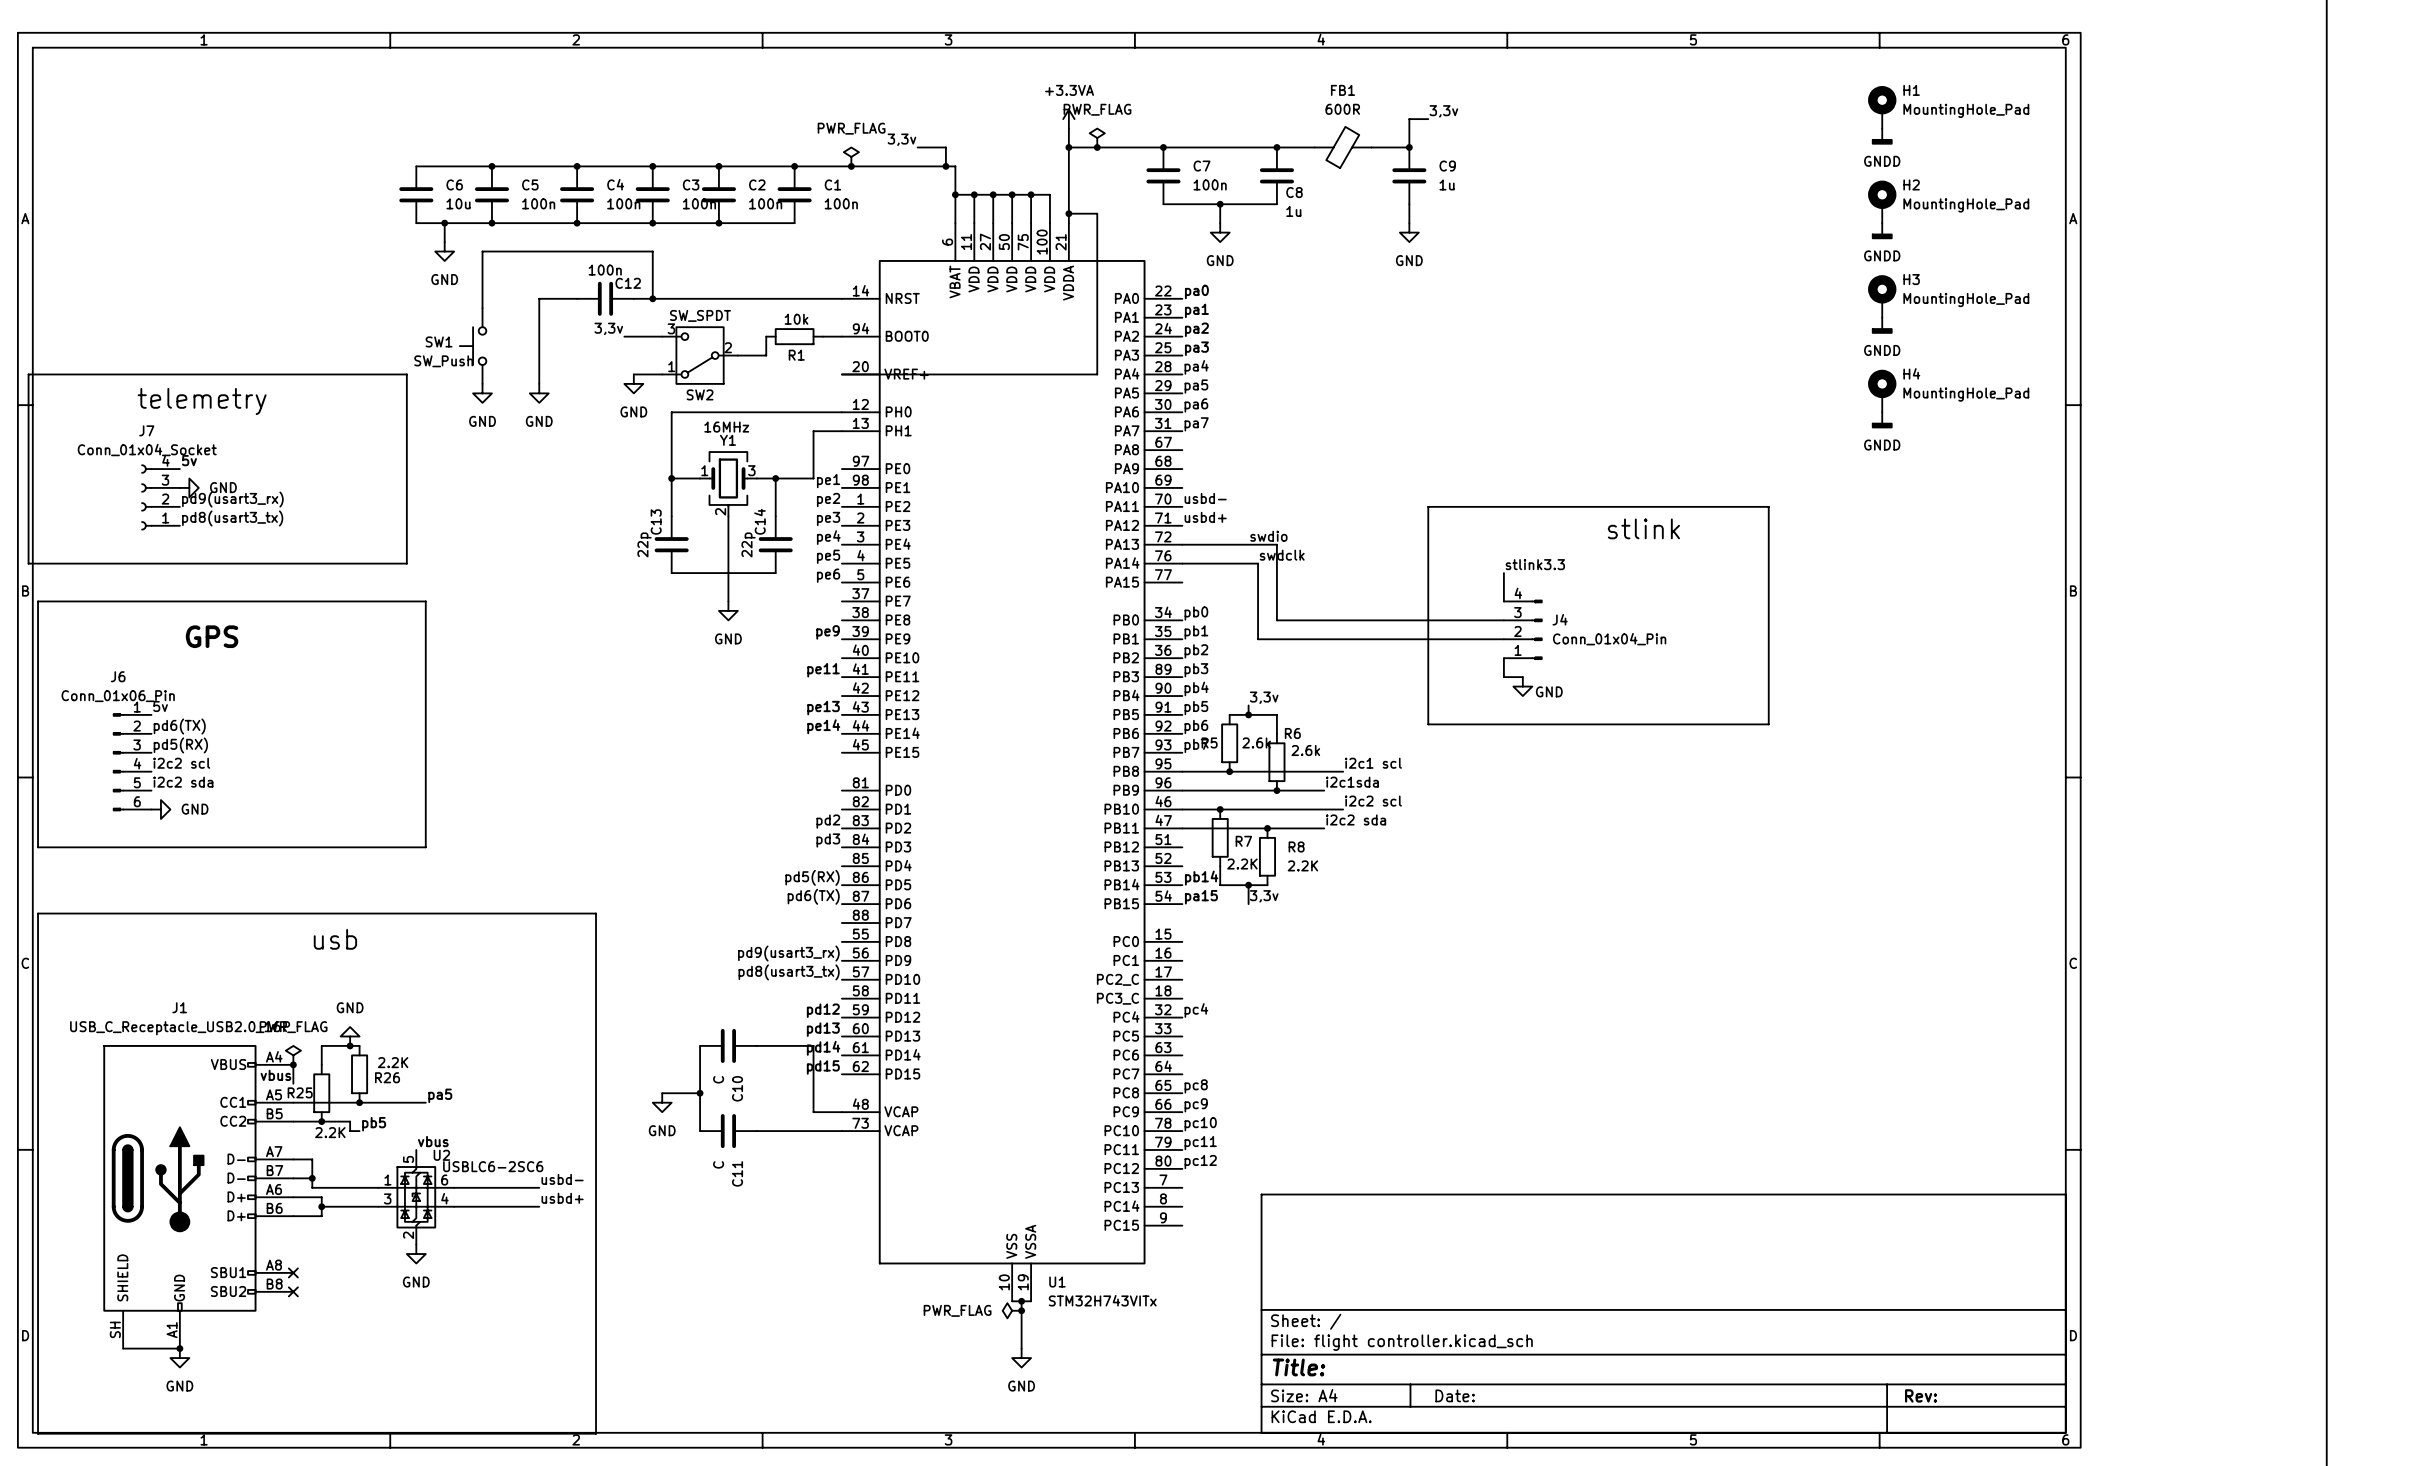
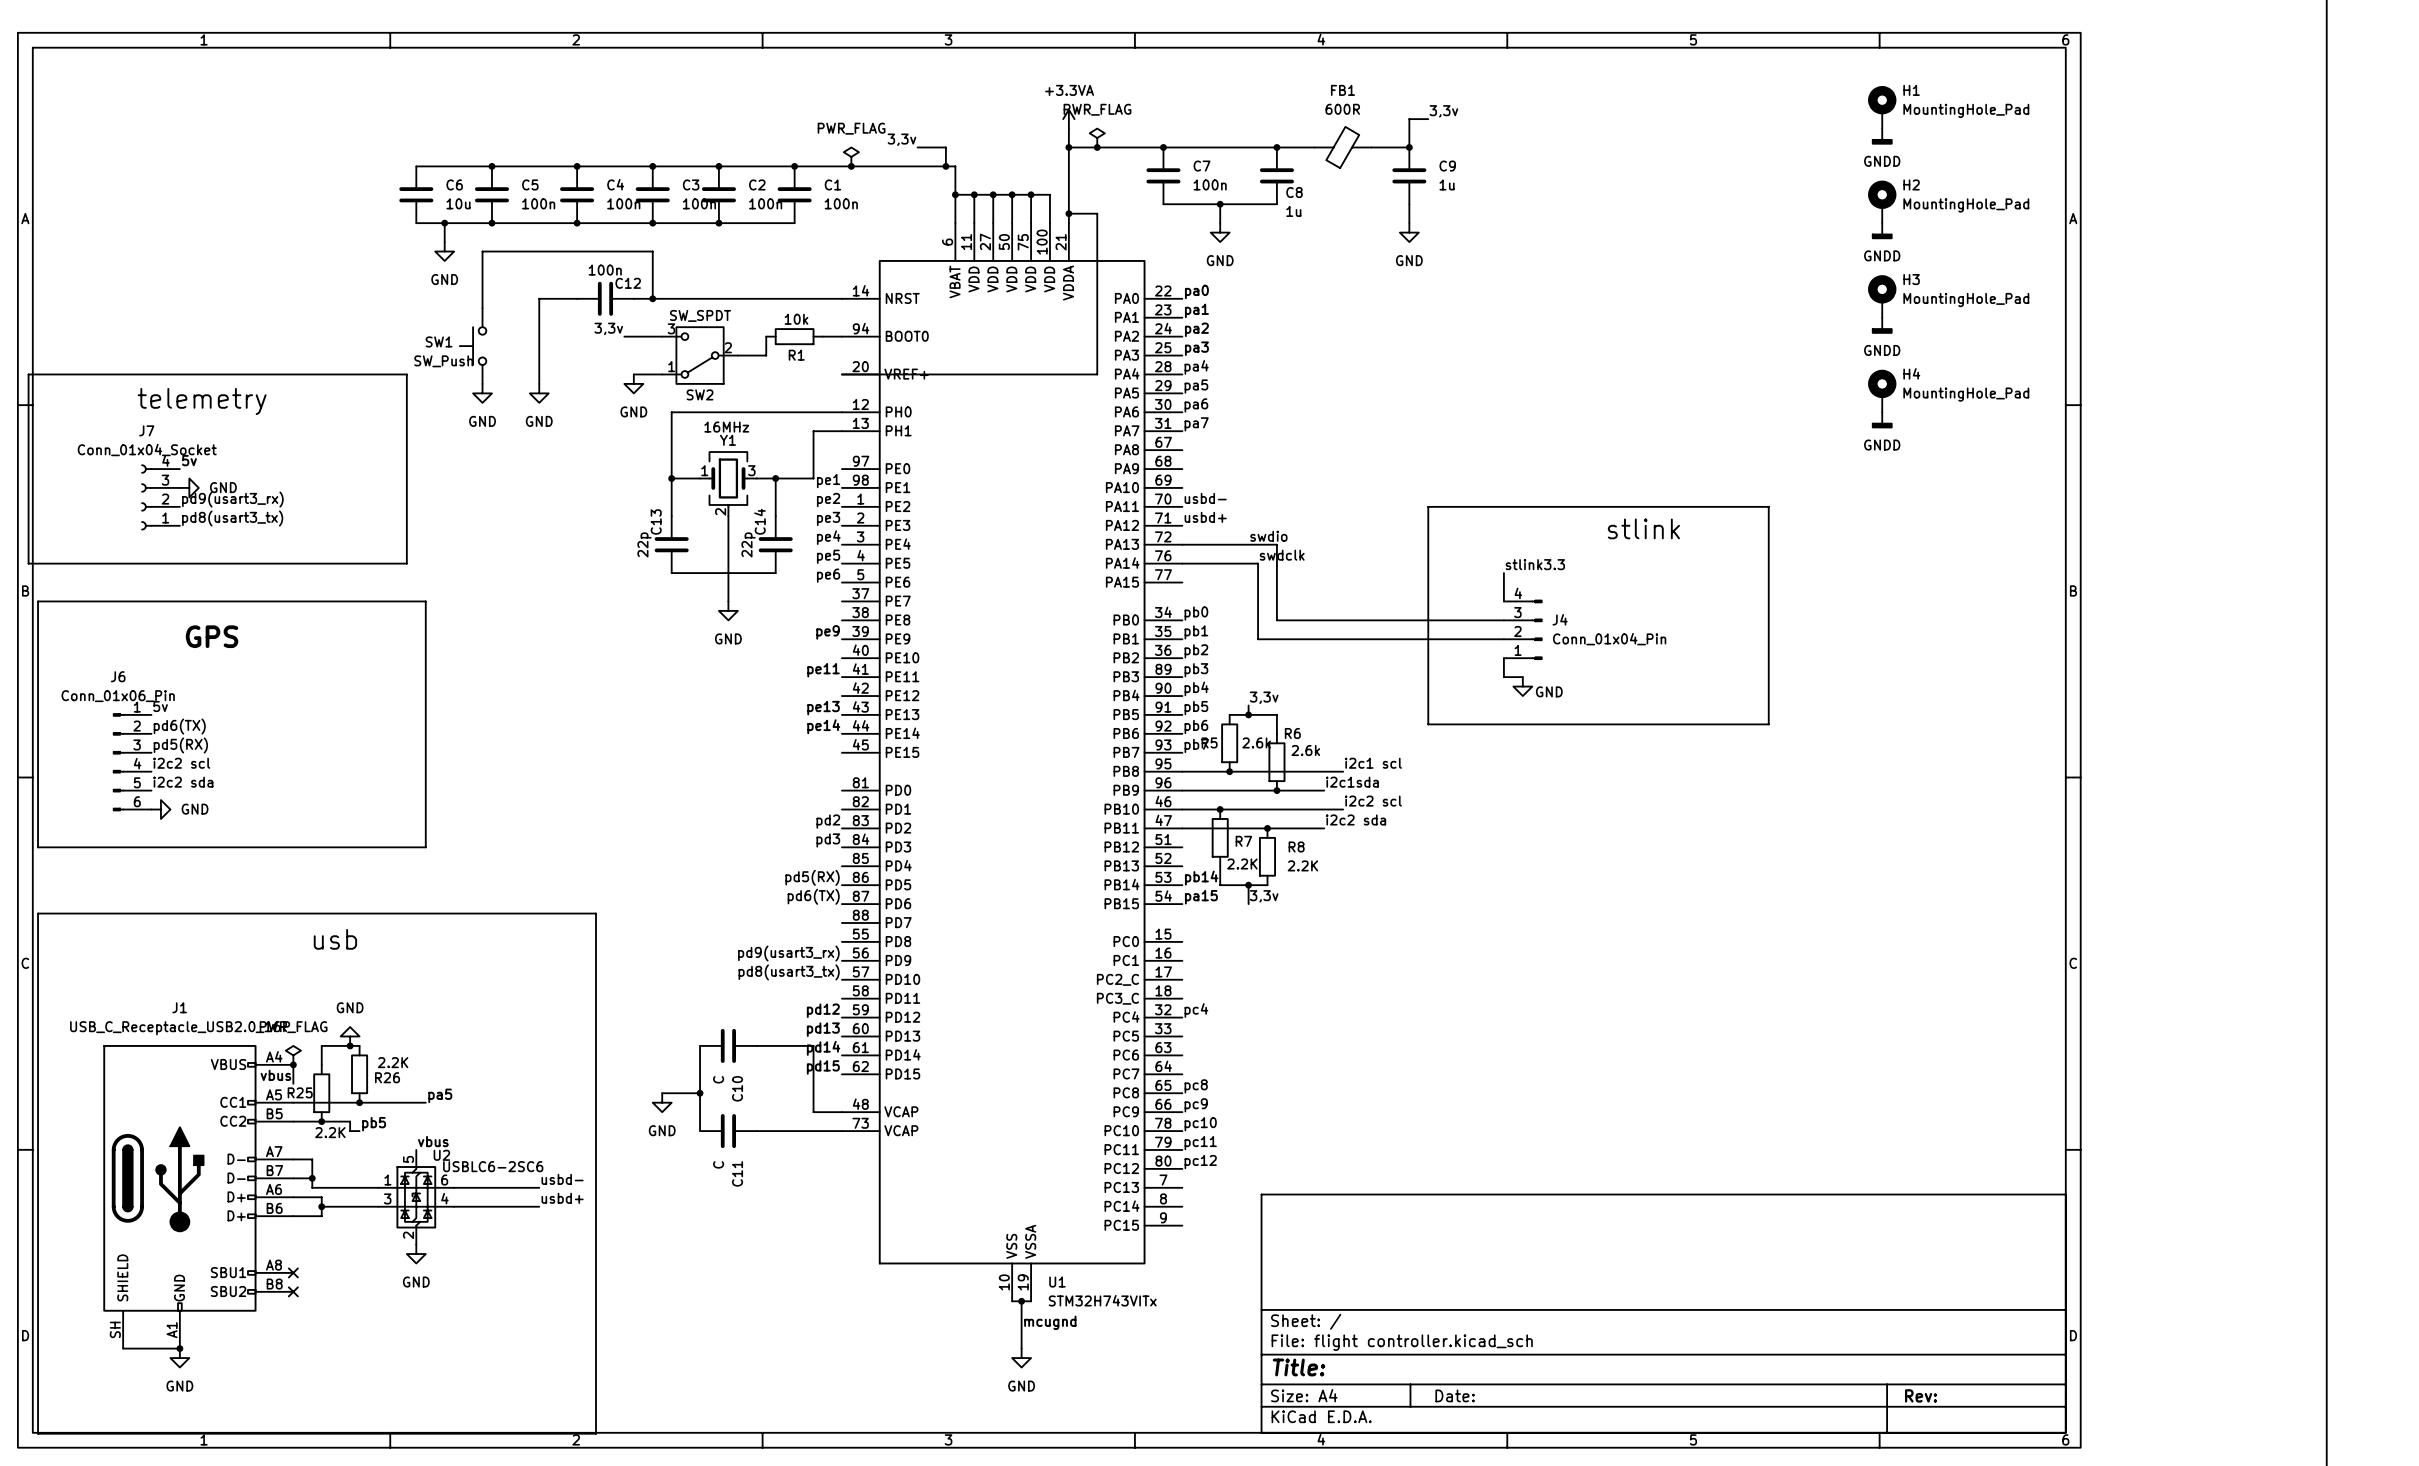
power symbol: PWR_FLAG (1012, 1310) -> none
junction: (1021, 1310) -> none
label: none -> mcugnd (1050, 1322)

